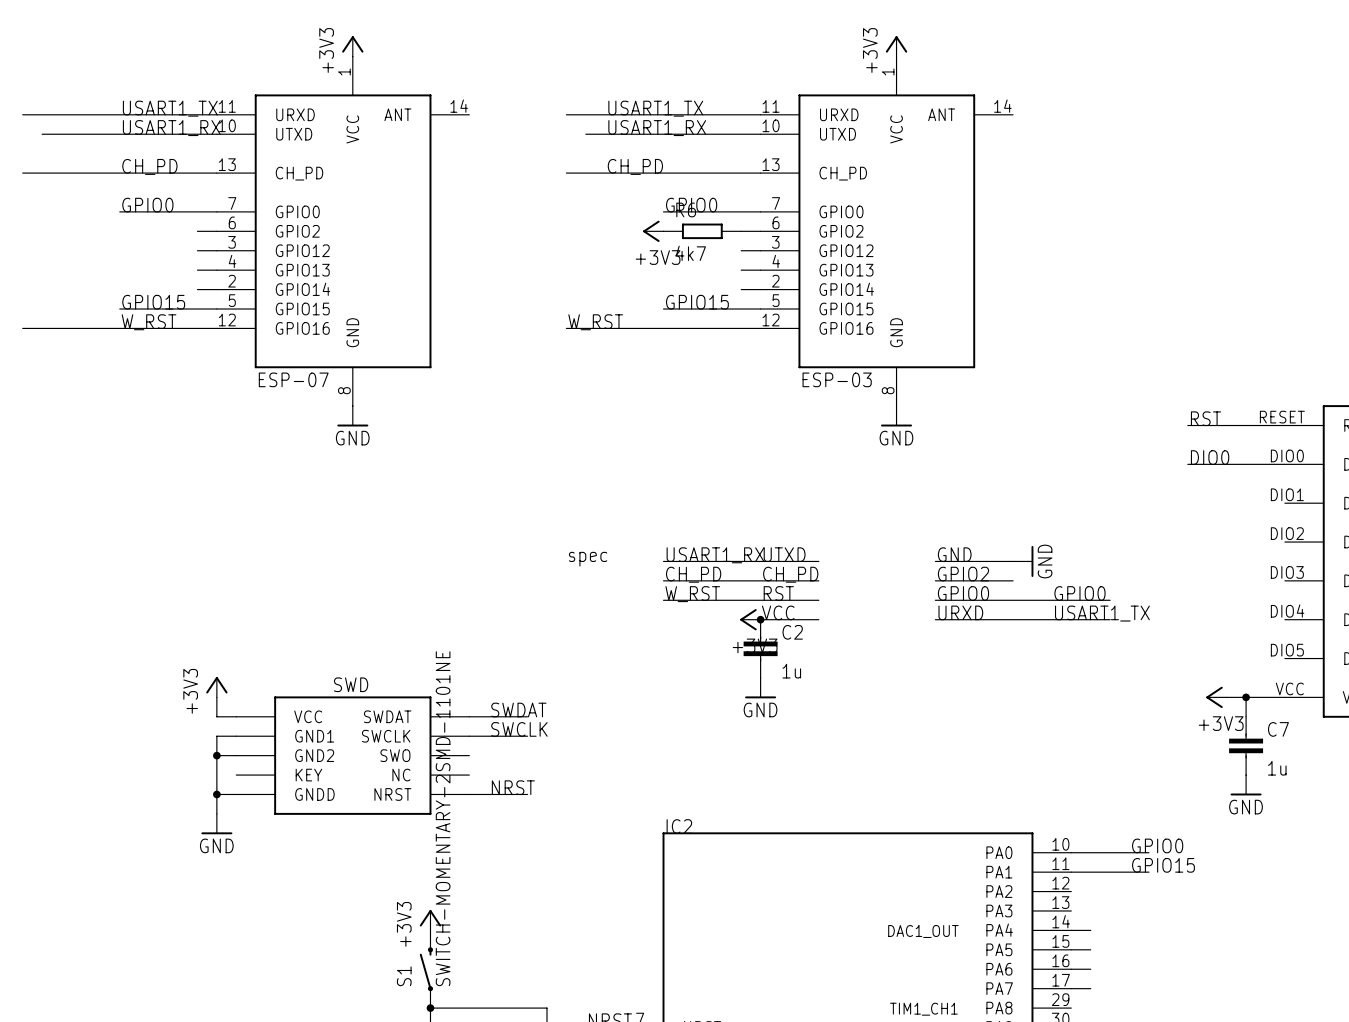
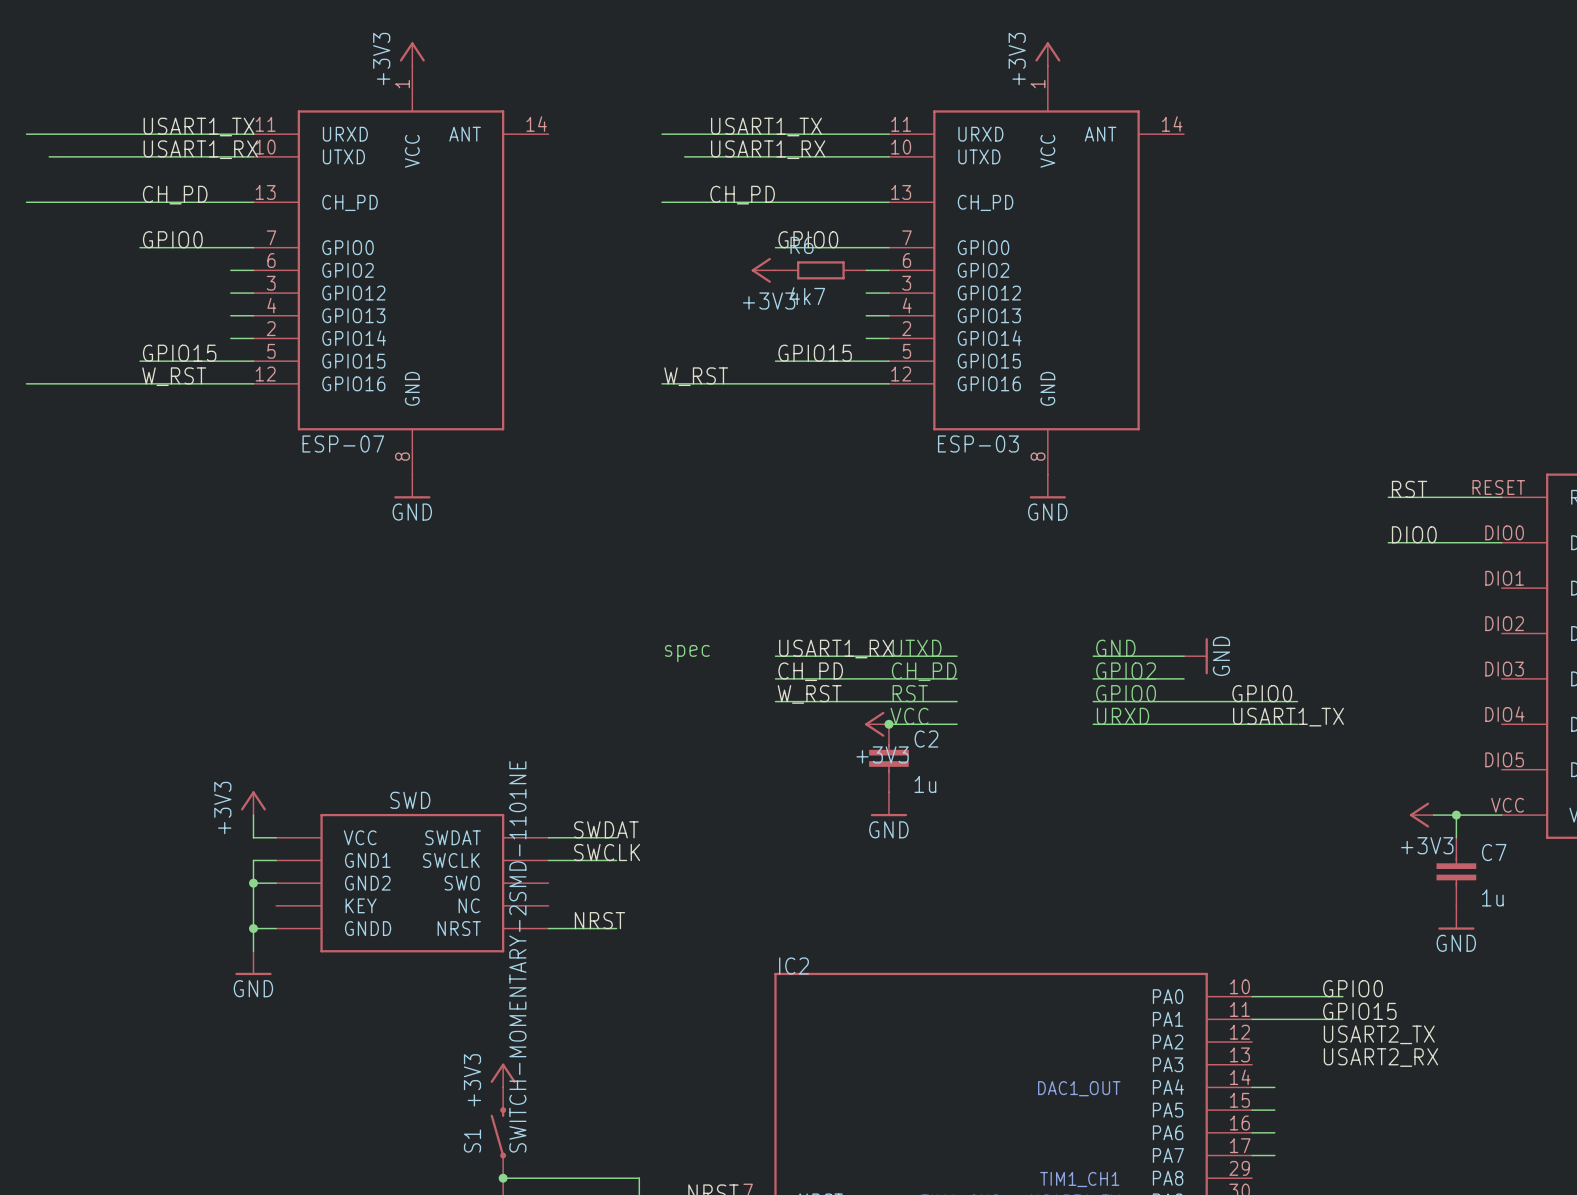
label: none -> USART2_TX (1379, 1034)
label: none -> USART2_RX (1380, 1057)

